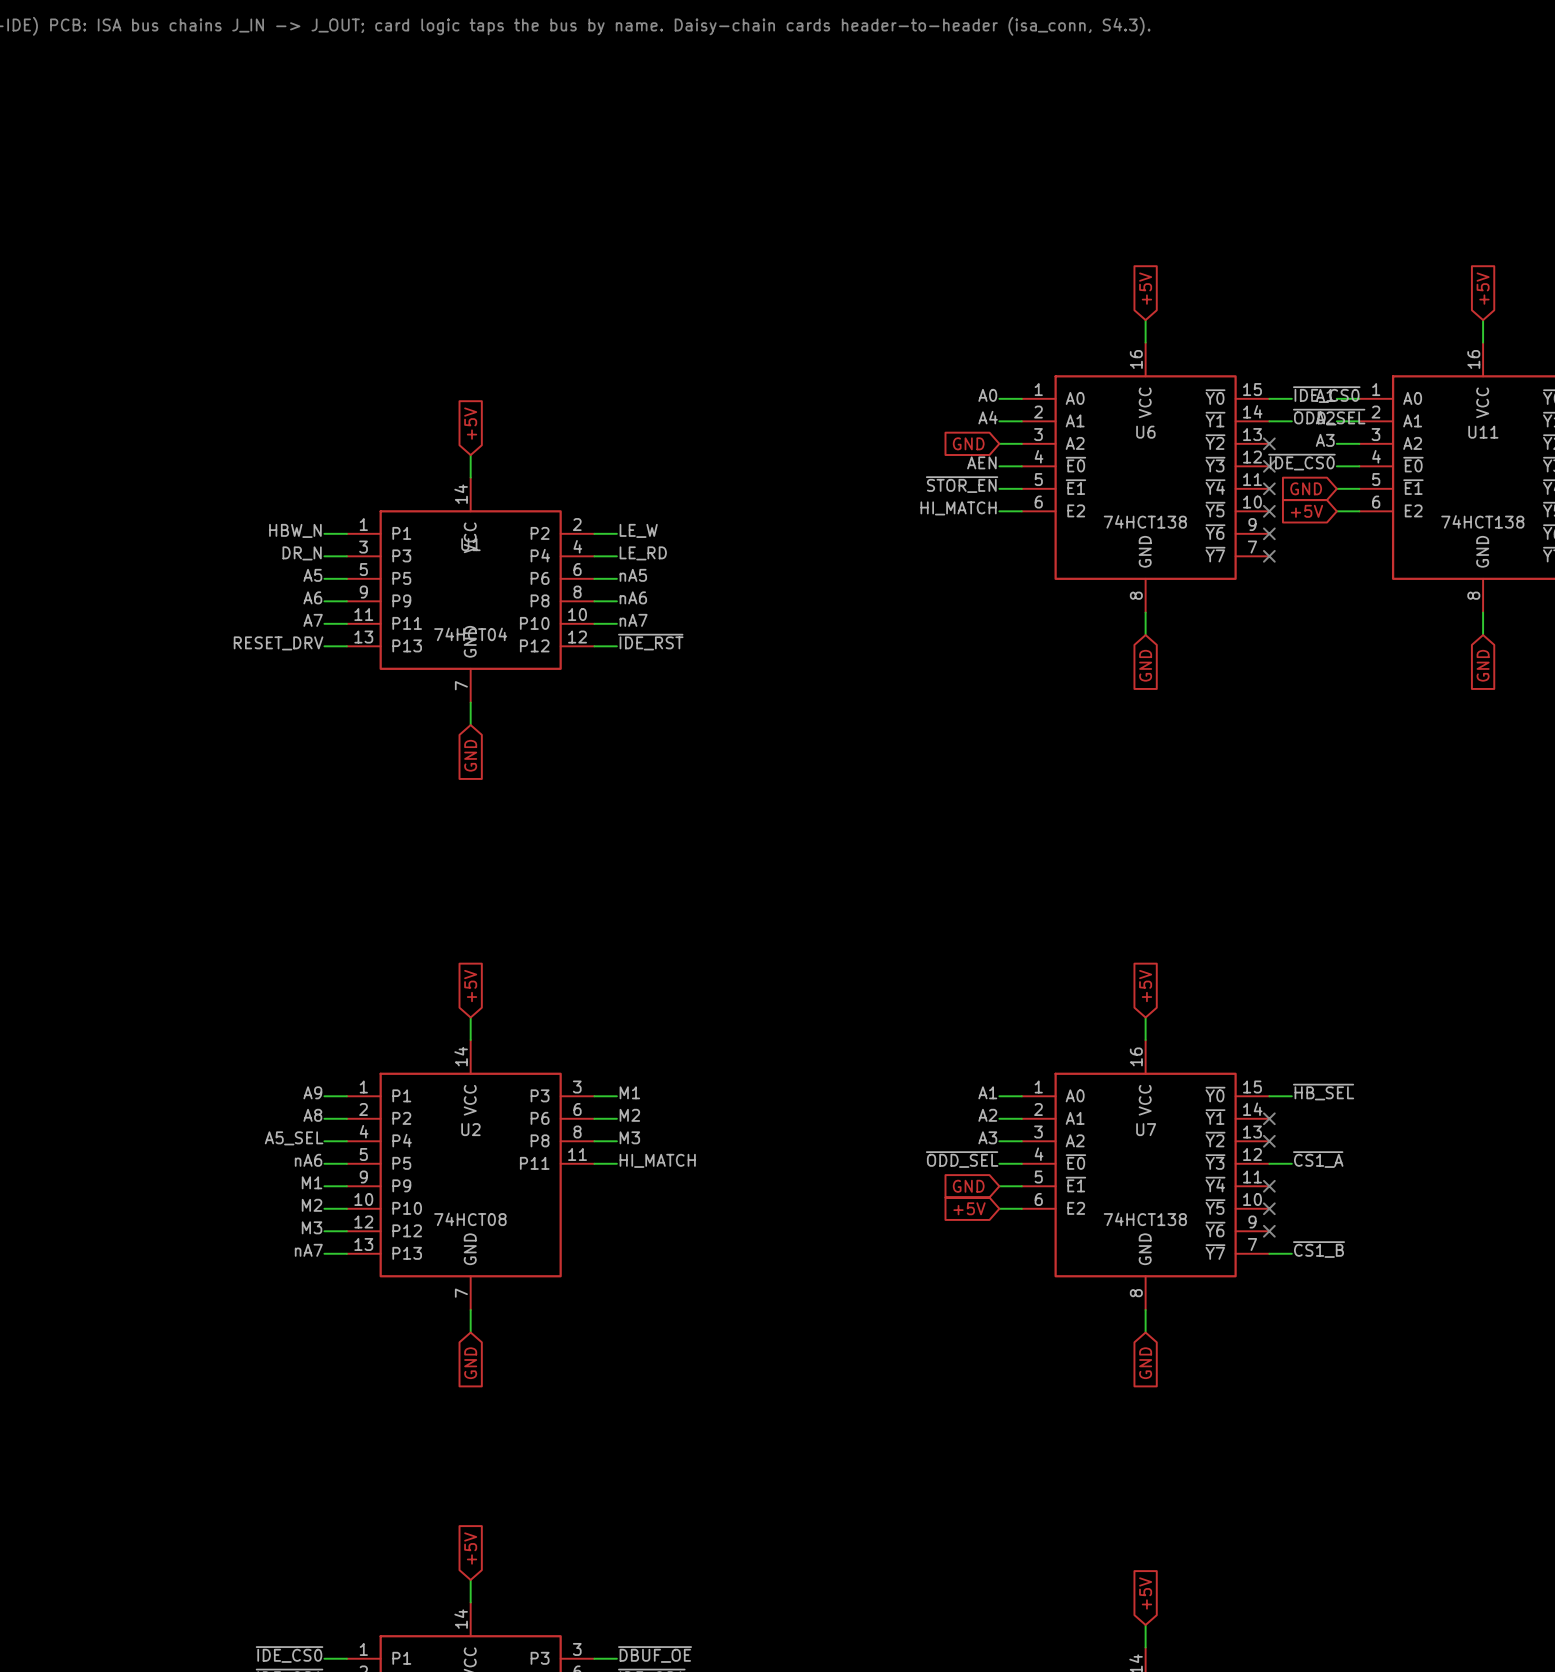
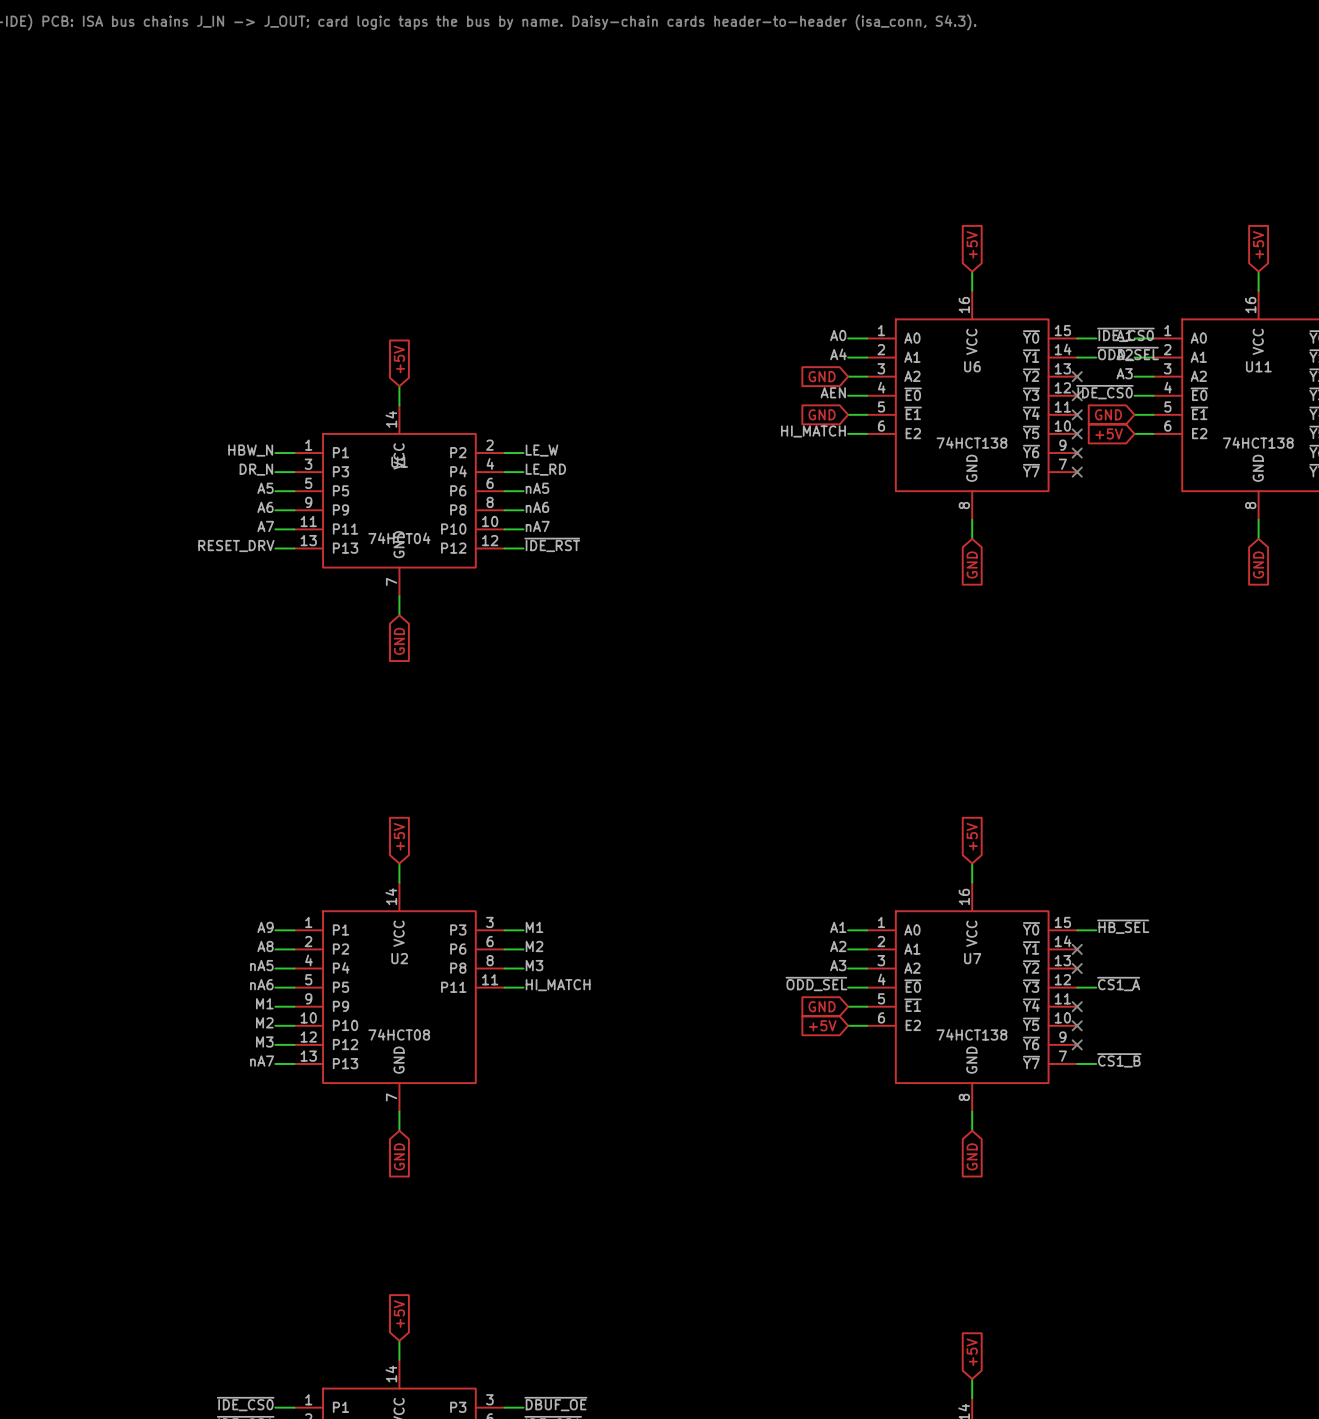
label: ~{STOR_EN} (962, 484) -> none
global label: none -> GND (822, 414)
label: A5_SEL (294, 1138) -> nA5 (261, 965)

